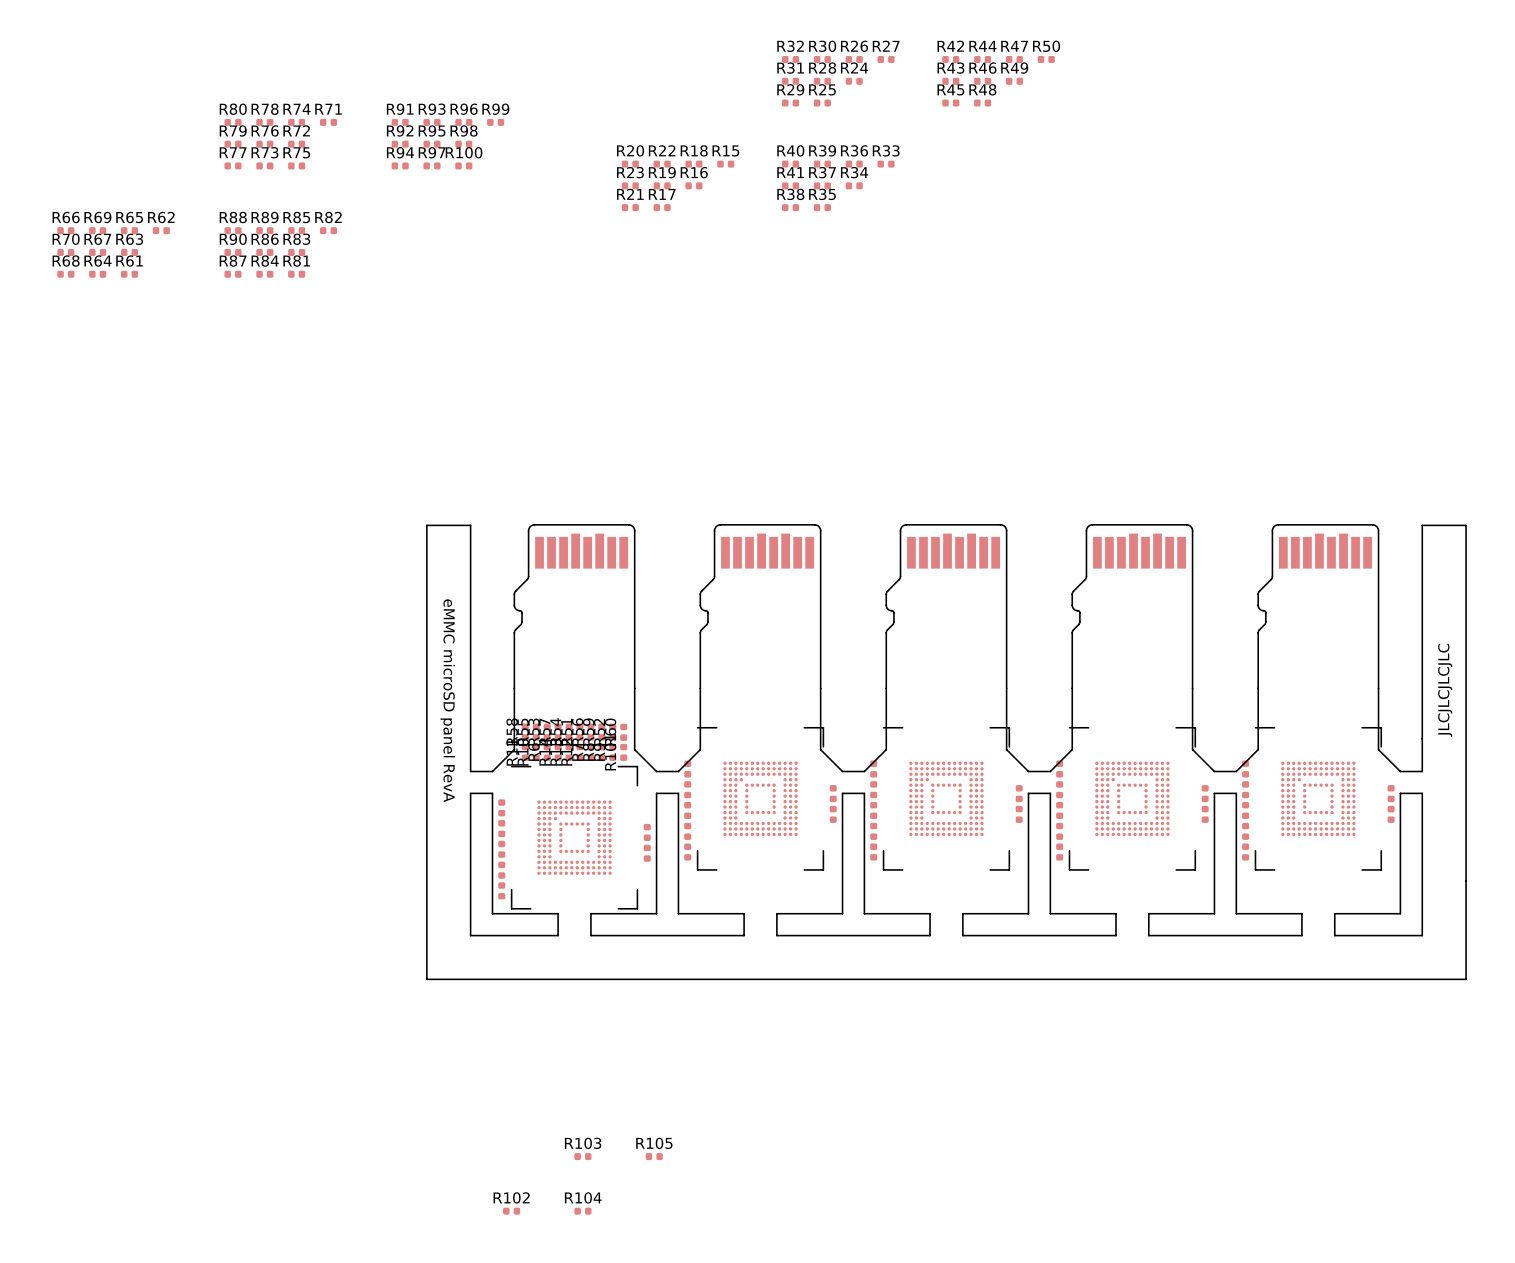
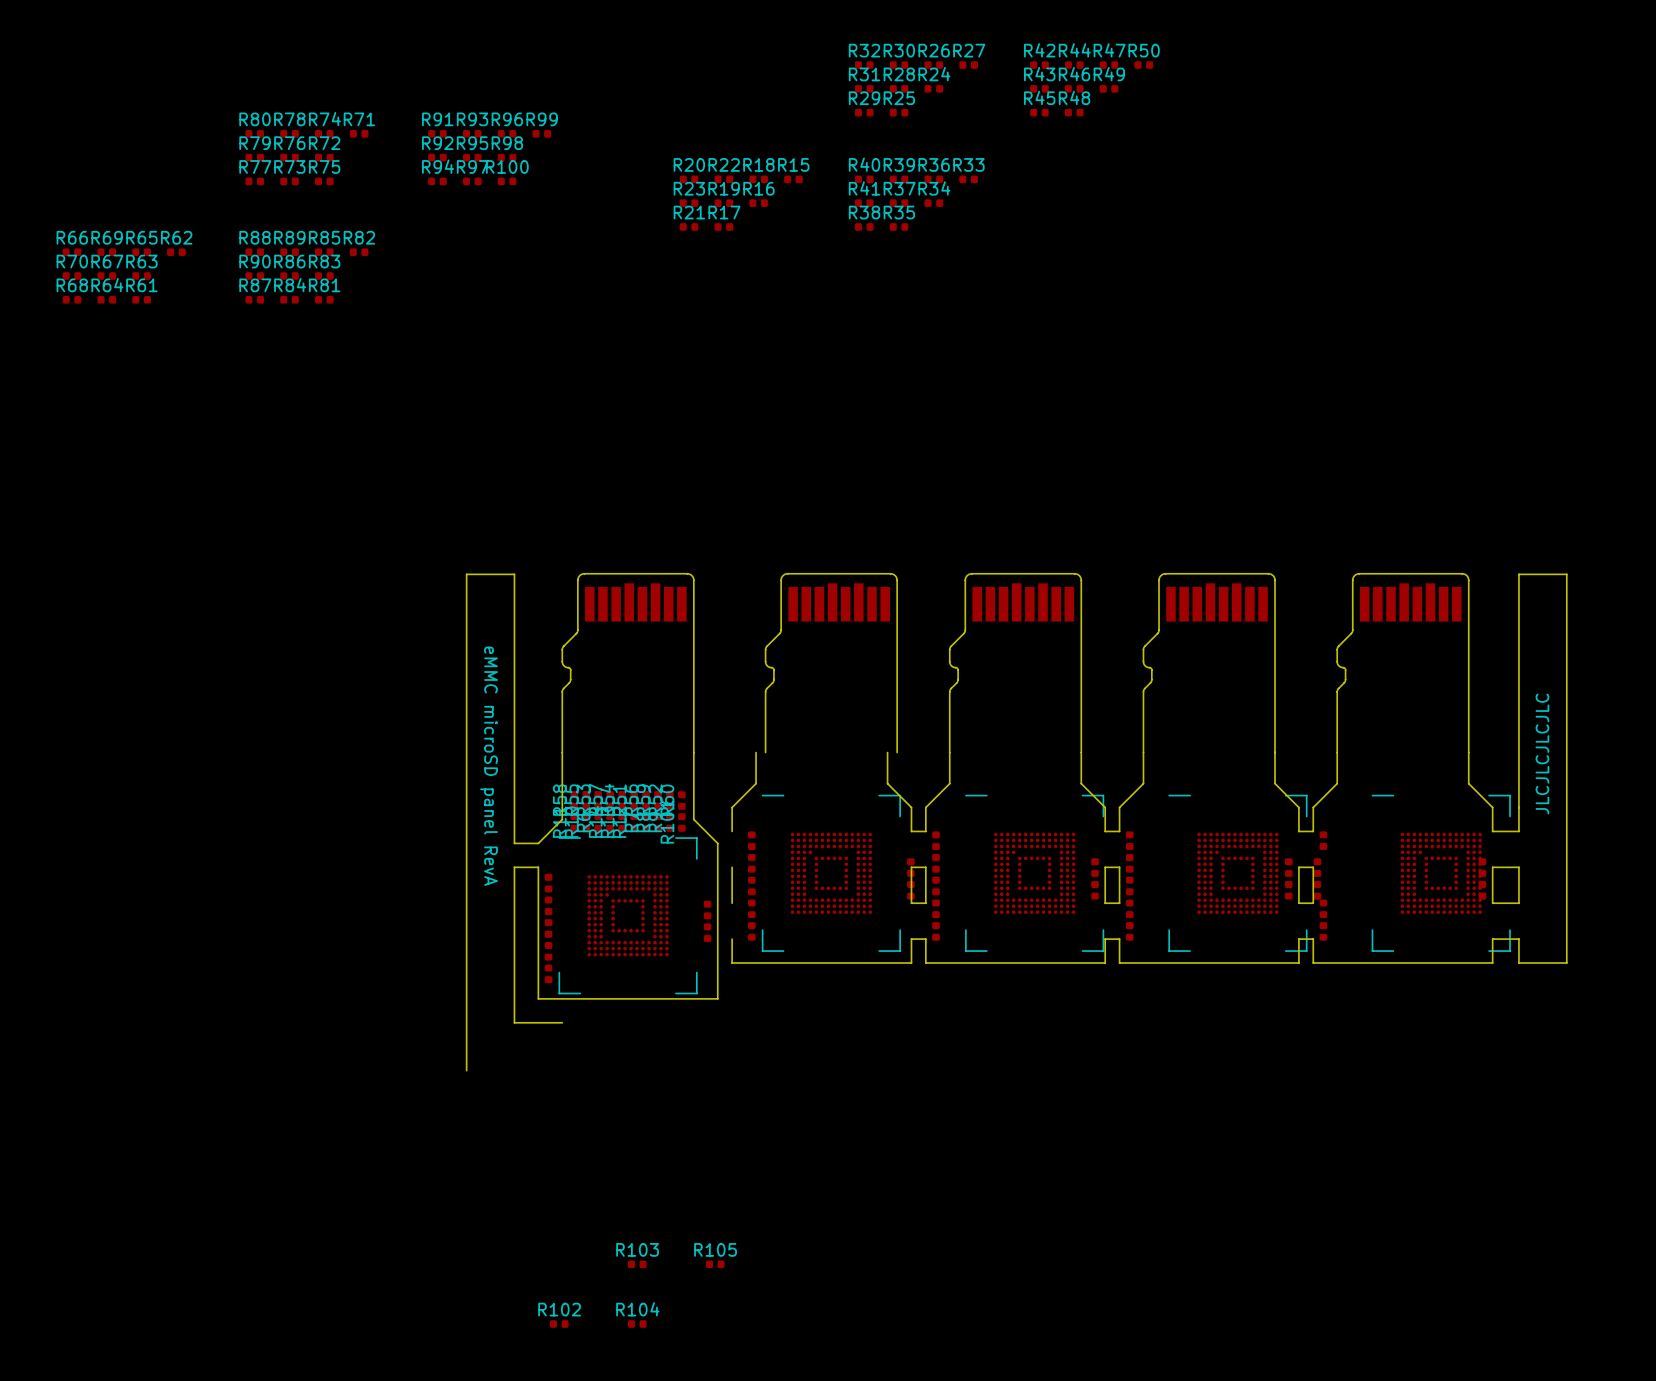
board edge: (1422, 525) (1422, 771) (1400, 771) (1378, 749) (1378, 688) -> (1554, 574) (1518, 574) (1518, 831) (1492, 831) (1492, 807) (1468, 783) (1468, 752)
board edge: (1433, 525) (1466, 525) (1466, 979) (426, 979) -> (1566, 574) (1566, 963) (1518, 963) (1518, 939) (1492, 939) (1492, 963) (1313, 963) (1313, 939) (1298, 939) (1298, 963) (1119, 963) (1119, 939) (1105, 939) (1105, 963) (925, 963) (925, 939) (911, 939) (911, 963) (732, 963) (732, 939)
part position: (946, 606) -> (1015, 663)
part position: (1132, 606) -> (1209, 663)
part position: (1318, 606) -> (1402, 663)
board edge: none -> (756, 752) (756, 783) (732, 807) (732, 831)
board edge: (700, 688) (700, 749) (678, 771) (656, 771) -> (717, 867) (717, 843)
board edge: none -> (887, 752) (887, 783) (911, 807) (911, 831) (925, 831) (925, 807) (949, 783) (949, 752)
board edge: (820, 688) (820, 749) (842, 771) (864, 771) (886, 749) (886, 688) -> none
board edge: none -> (1081, 752) (1081, 783) (1105, 807) (1105, 831) (1119, 831) (1119, 807) (1143, 783) (1143, 752)
board edge: (1006, 688) (1006, 749) (1028, 771) (1050, 771) (1072, 749) (1072, 688) -> none
board edge: none -> (1275, 752) (1275, 783) (1298, 807) (1298, 831) (1313, 831) (1313, 807) (1337, 783) (1337, 752)
board edge: (1192, 688) (1192, 749) (1214, 771) (1236, 771) (1258, 749) (1258, 688) -> none
text position: JLCJLCJLCJLC (1445, 690) -> JLCJLCJLCJLC (1542, 754)
part: none -> (935, 840)
part: (873, 768) -> none
part: none -> (1129, 840)
part: (1059, 768) -> none
part: none -> (1323, 840)
part: (1245, 768) -> none
part: none -> (935, 863)
part: (873, 789) -> none
part: none -> (1129, 863)
part: (1059, 789) -> none
part: (1245, 789) -> none
board edge: (656, 793) (678, 793) (678, 913) (744, 913) (744, 935) (590, 935) (590, 913) -> none
board edge: none -> (732, 867) (732, 903)
board edge: (842, 793) (842, 913) (776, 913) (776, 935) (930, 935) (930, 913) (864, 913) (864, 793) (846, 793) -> (921, 867) (911, 867) (911, 903) (925, 903) (925, 867)
part: none -> (1095, 867)
board edge: none -> (1105, 867) (1119, 867) (1119, 903) (1105, 903) (1105, 867)
part: (1019, 793) -> none
board edge: (1028, 793) (1050, 793) (1050, 913) (1115, 913) (1115, 935) (962, 935) (962, 913) (1028, 913) (1028, 793) -> none
part: none -> (1288, 867)
board edge: none -> (1298, 867) (1313, 867) (1313, 903) (1298, 903) (1298, 867)
board edge: (1214, 793) (1236, 793) (1236, 913) (1301, 913) (1301, 935) (1148, 935) (1148, 913) (1214, 913) (1214, 793) -> none
part: none -> (1482, 867)
board edge: none -> (1492, 867) (1518, 867) (1518, 903) (1492, 903) (1492, 867)
part: (1391, 793) -> none
board edge: (1400, 793) (1422, 793) (1422, 935) (1334, 935) (1334, 913) (1400, 913) (1400, 793) -> none
part: none -> (935, 885)
part: (873, 810) -> none
part: none -> (1129, 885)
part: (1059, 810) -> none
part: (1245, 810) -> none
part: none -> (1095, 890)
part: (1019, 814) -> none
part: none -> (1288, 890)
part: none -> (1482, 890)
part: (1391, 814) -> none
part: none -> (935, 908)
part: (873, 831) -> none
part: none -> (1129, 908)
part: (1059, 831) -> none
part: none -> (1323, 908)
part: (1245, 831) -> none
part: none -> (935, 931)
part: (873, 852) -> none
part: none -> (1129, 931)
part: (1059, 852) -> none
part: none -> (1323, 931)
part: (1245, 852) -> none
board edge: (558, 913) (558, 935) (514, 935) -> (610, 998) (646, 998)

